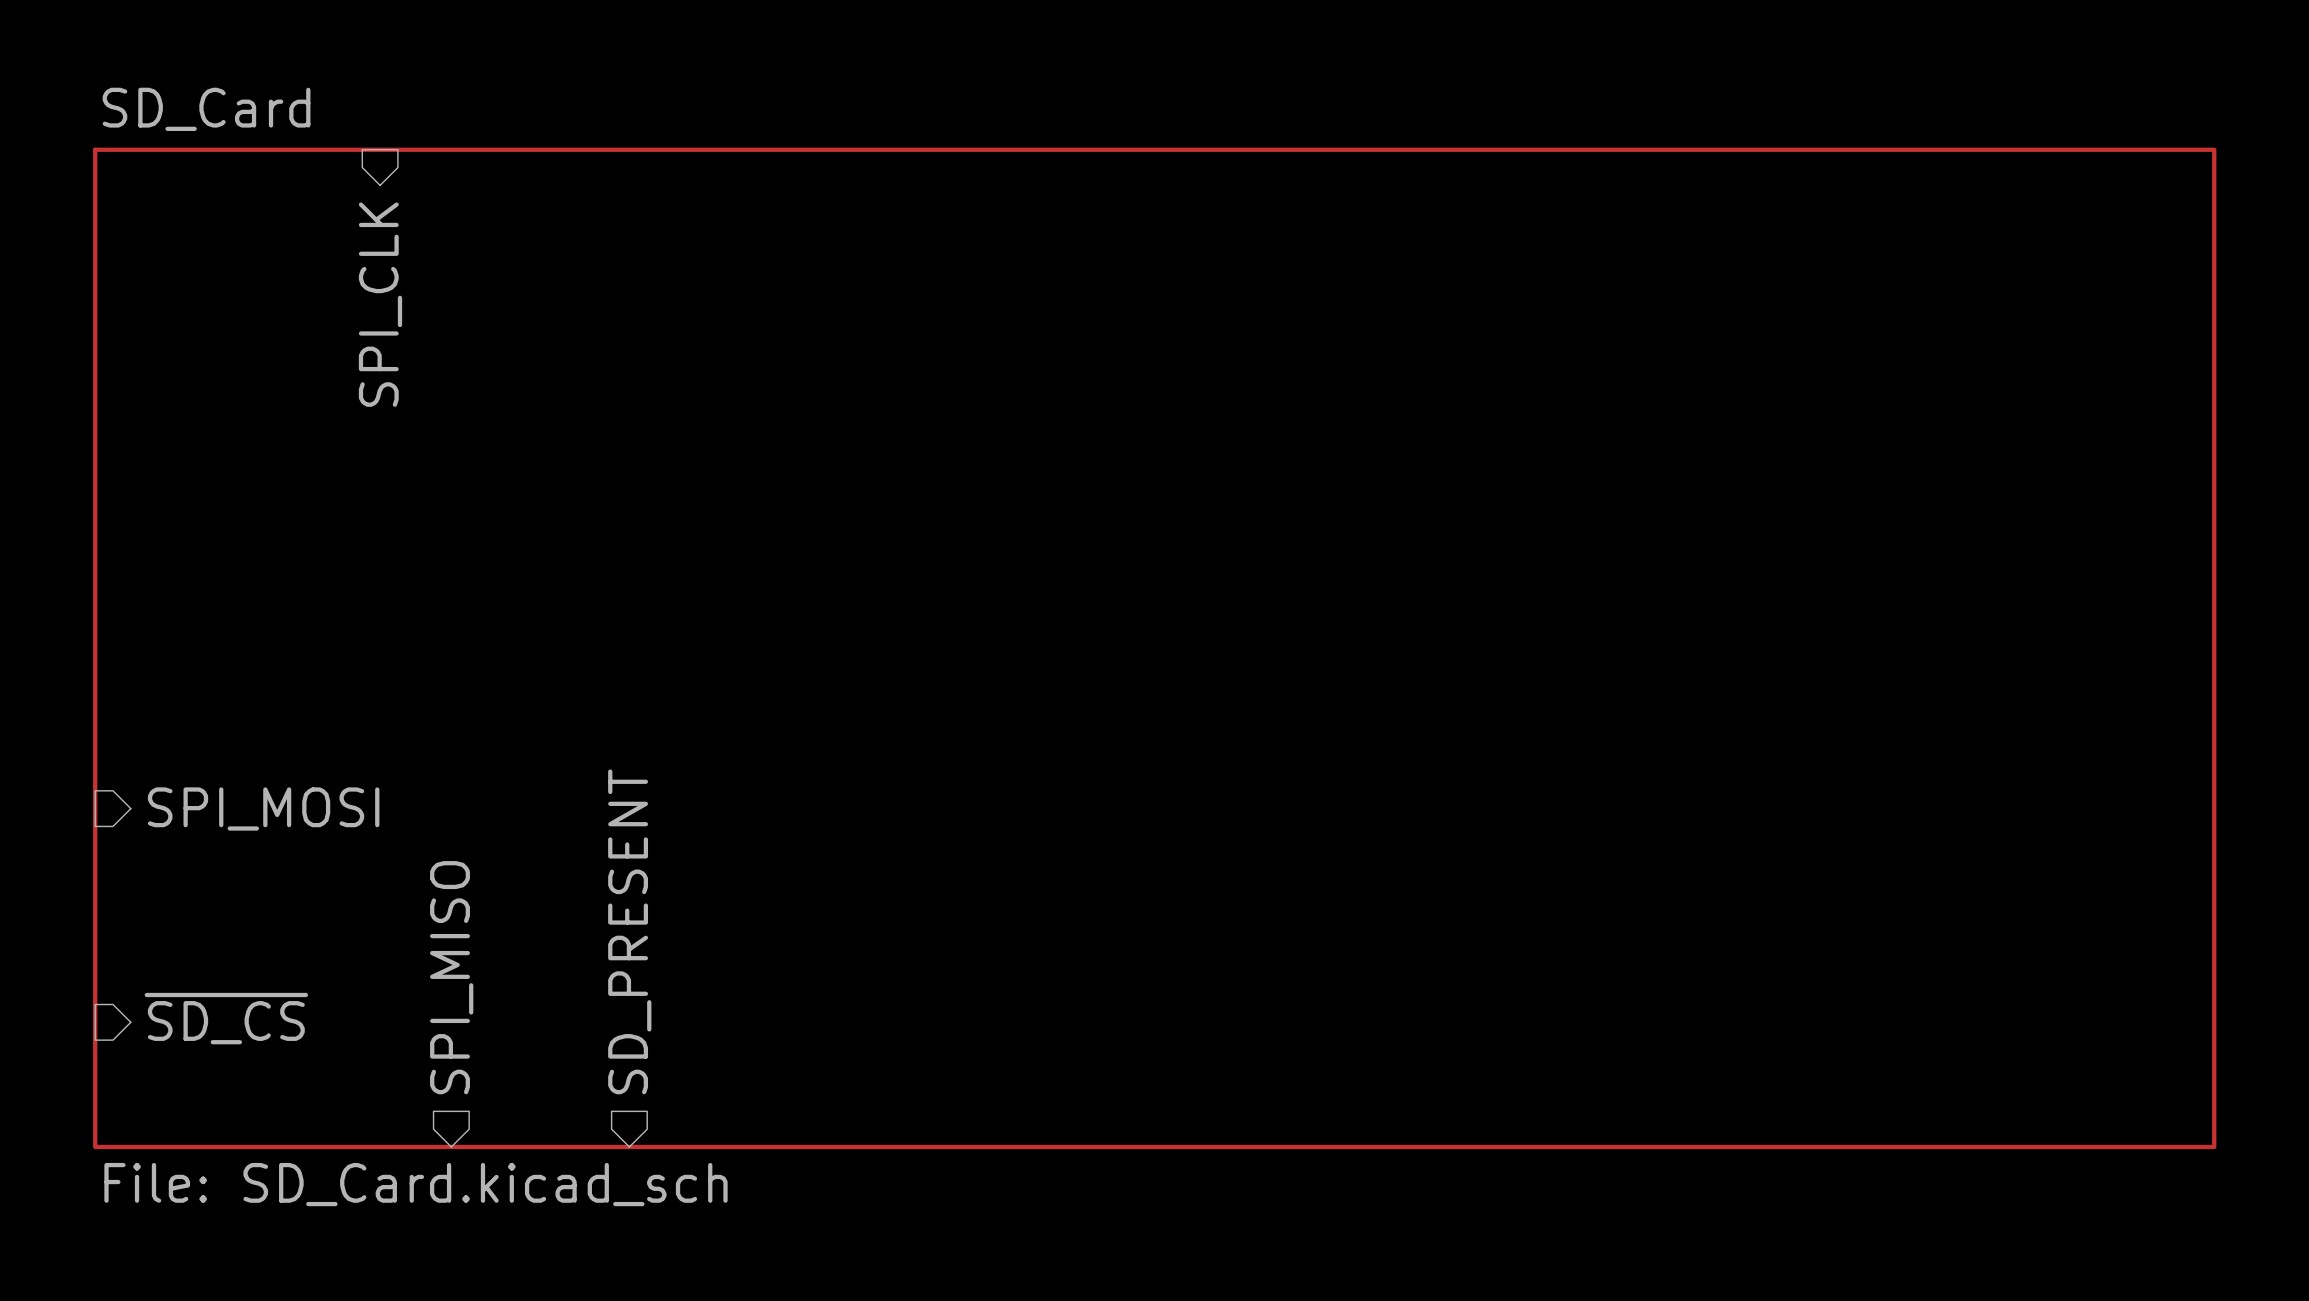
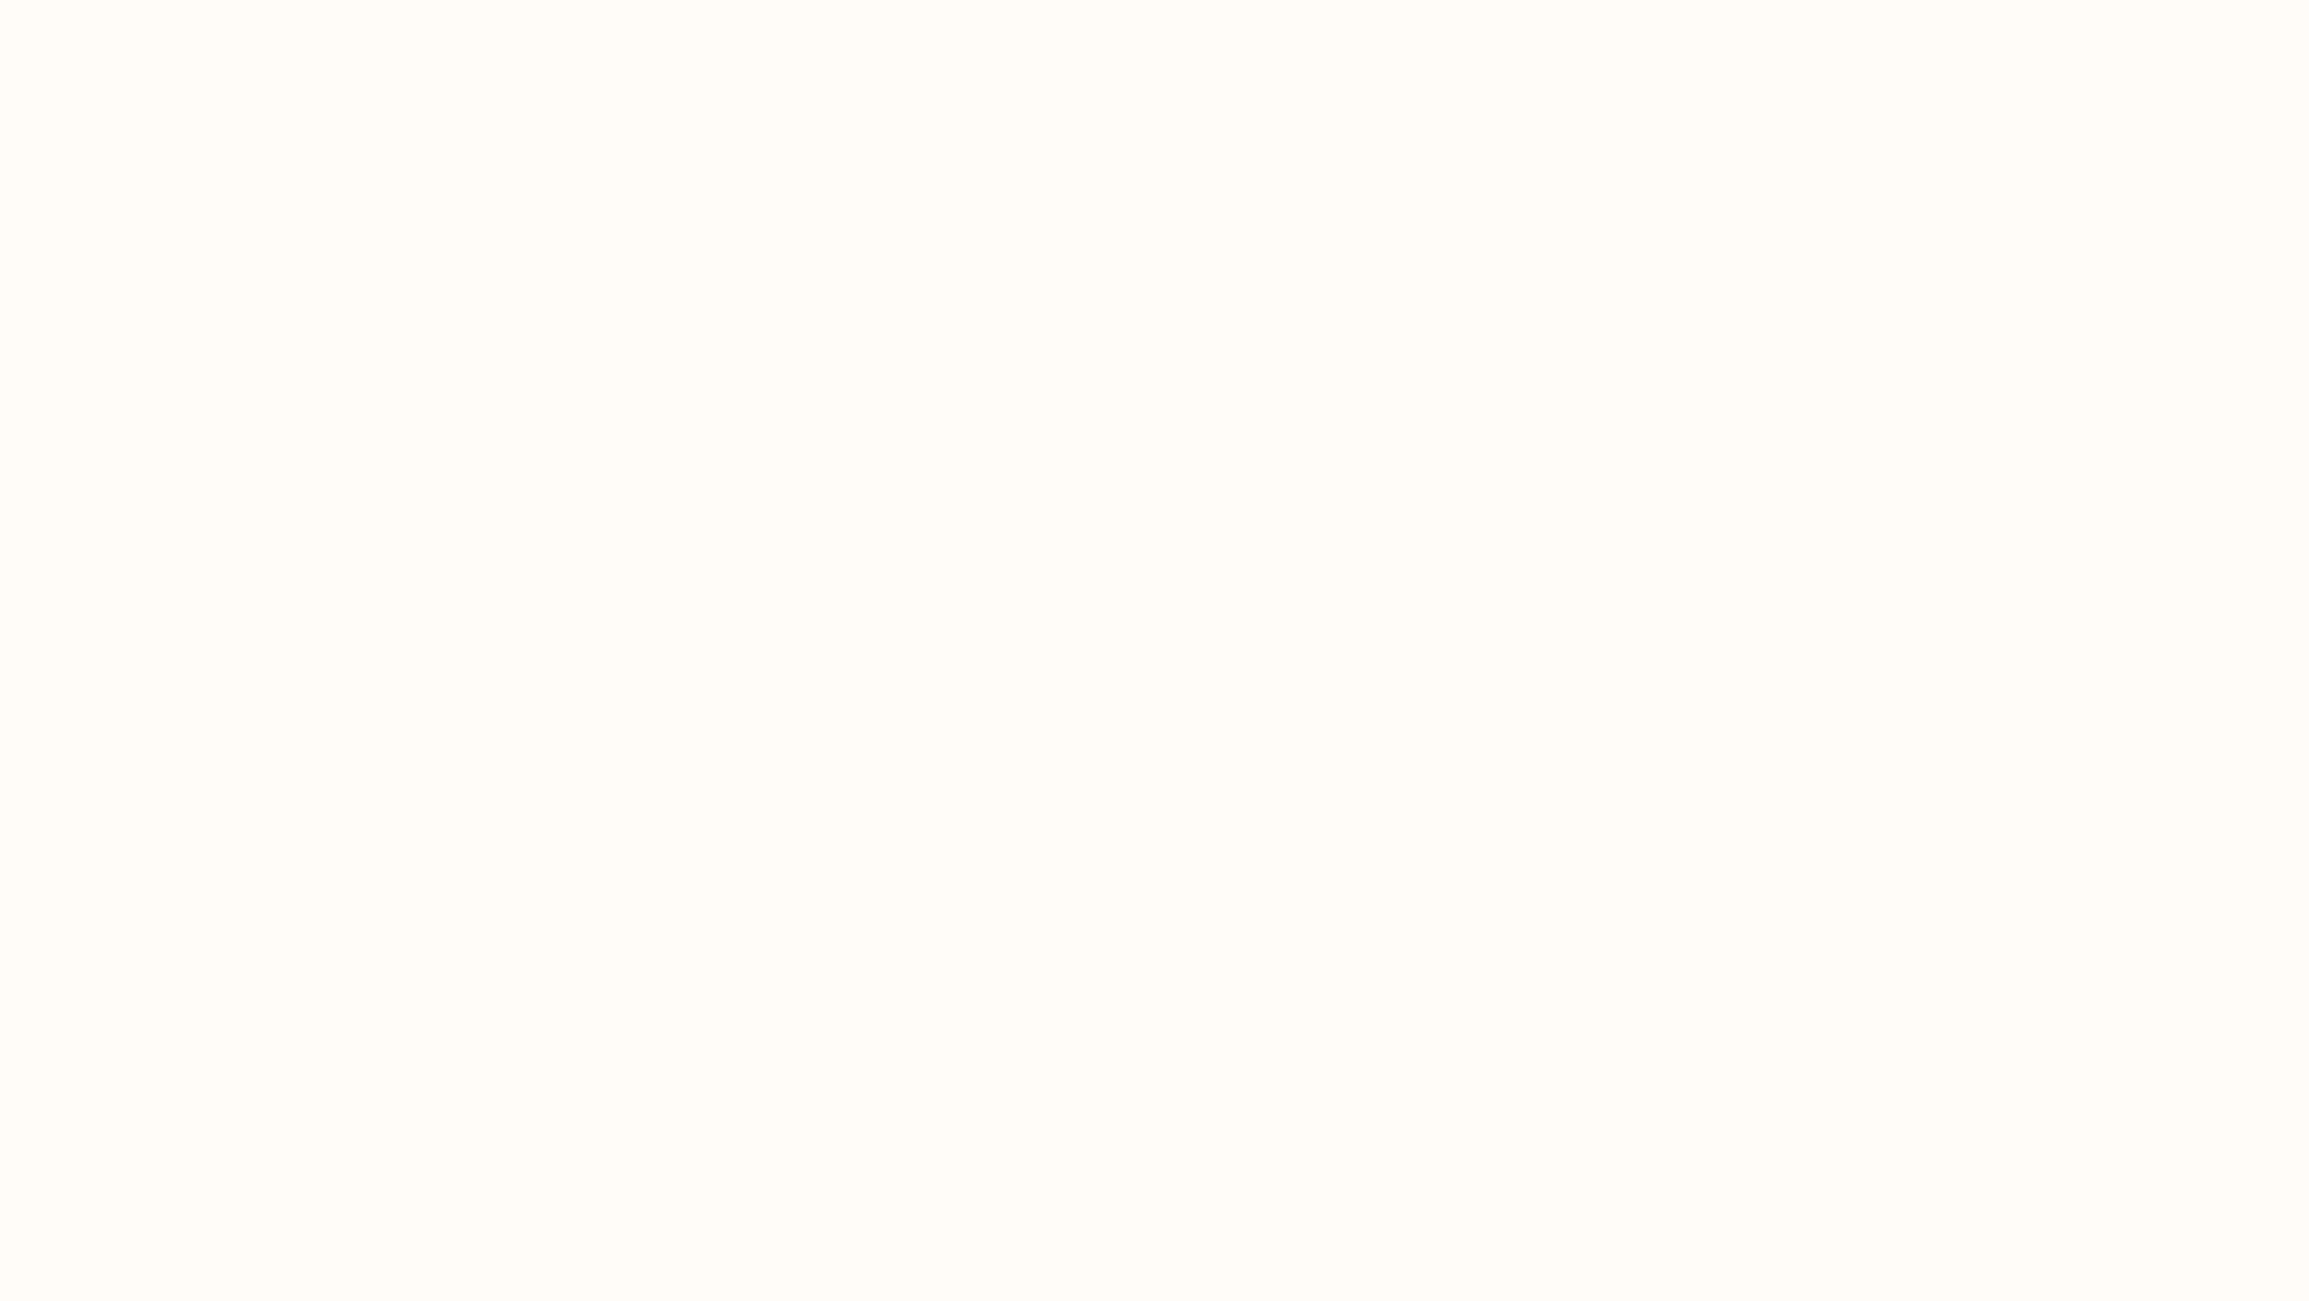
sheet pin: SPI_CLK (380, 304) -> none
sheet SD_Card: File: SD_Card.kicad_sch (1154, 648) -> none
sheet pin: SPI_MOSI (263, 809) -> none
sheet pin: SD_PRESENT (629, 931) -> none
sheet pin: SPI_MISO (451, 977) -> none
sheet pin: ~{SD_CS} (226, 1018) -> none

